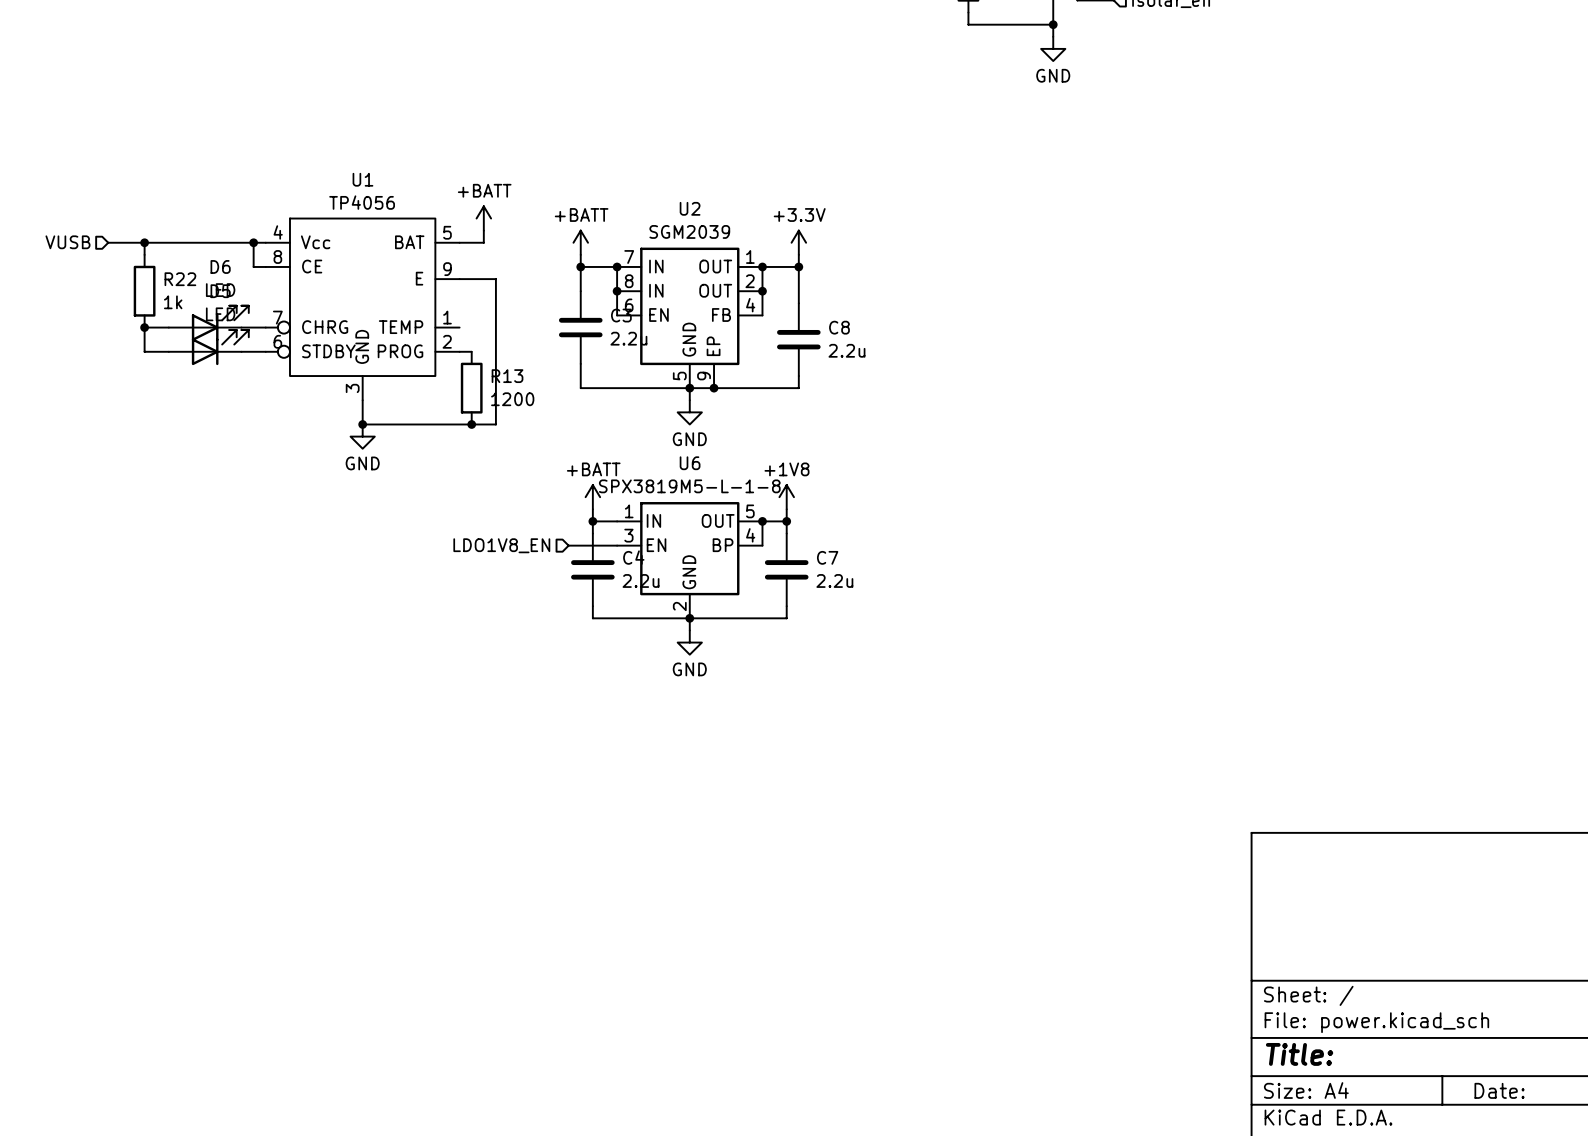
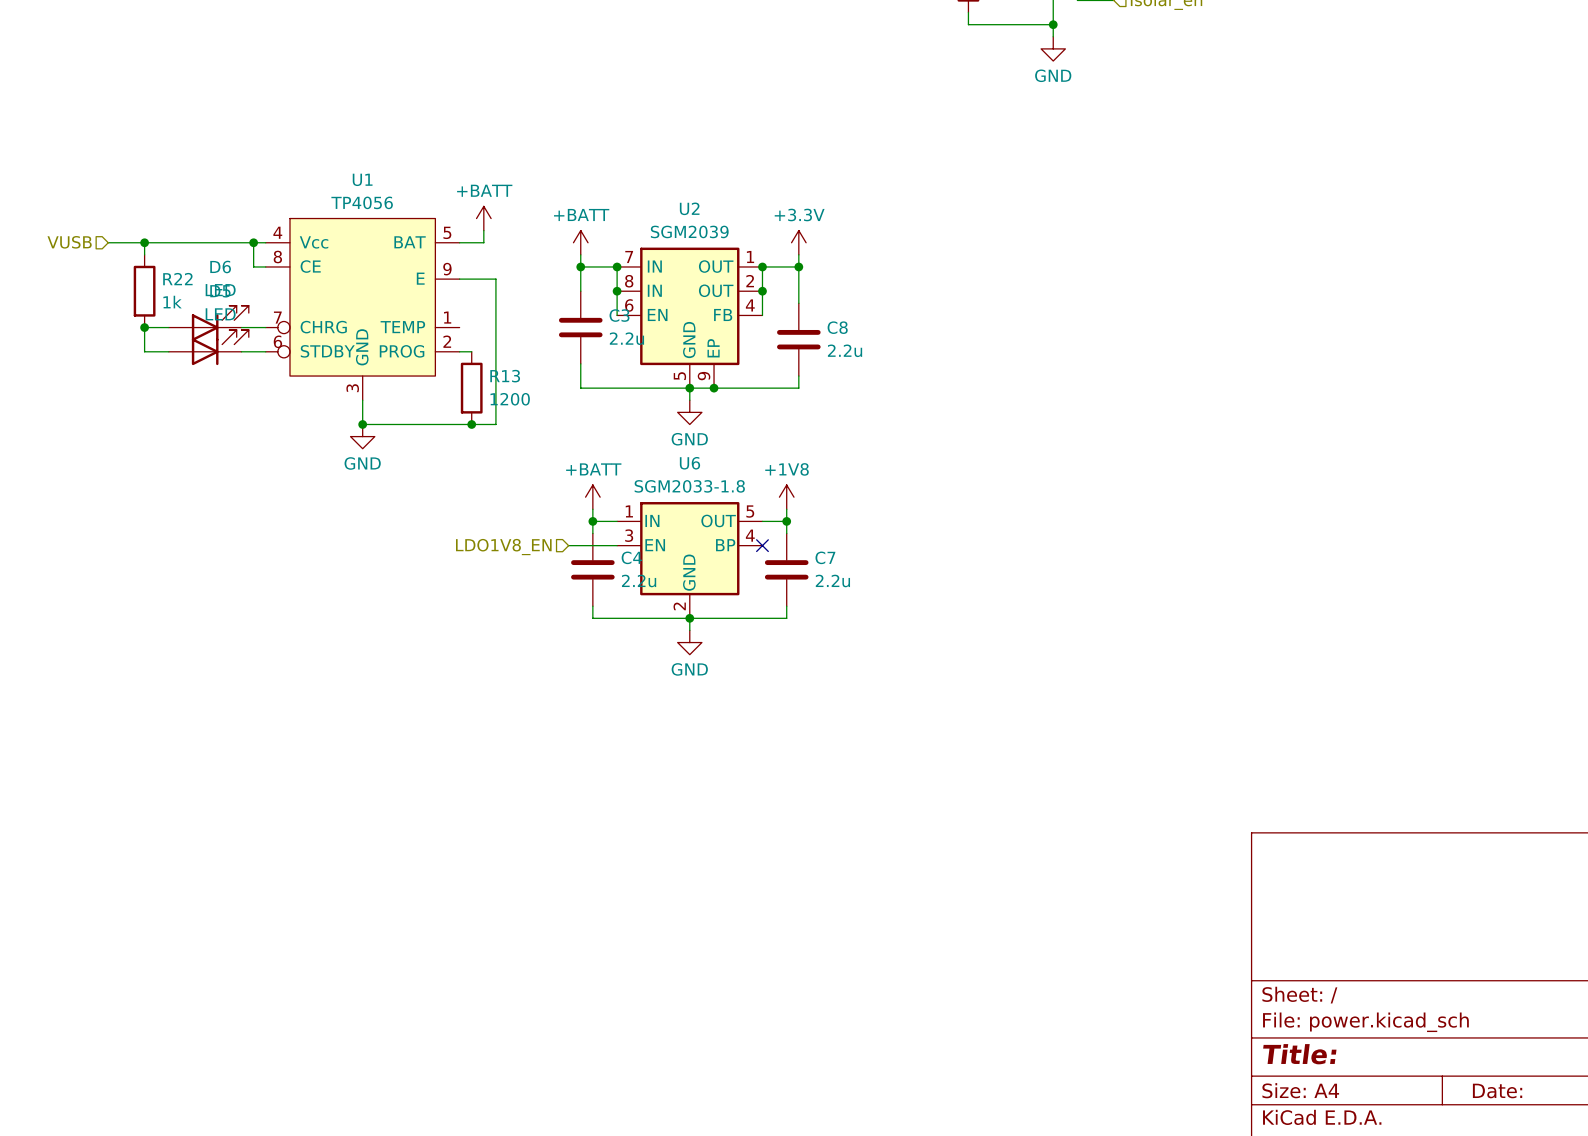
U6 value: SPX3819M5-L-1-8 (689, 486) -> SGM2033-1.8 (689, 486)
wire: (762, 521) (762, 545) -> none
junction: (762, 521) -> none
no-connect mark: none -> (762, 545)

